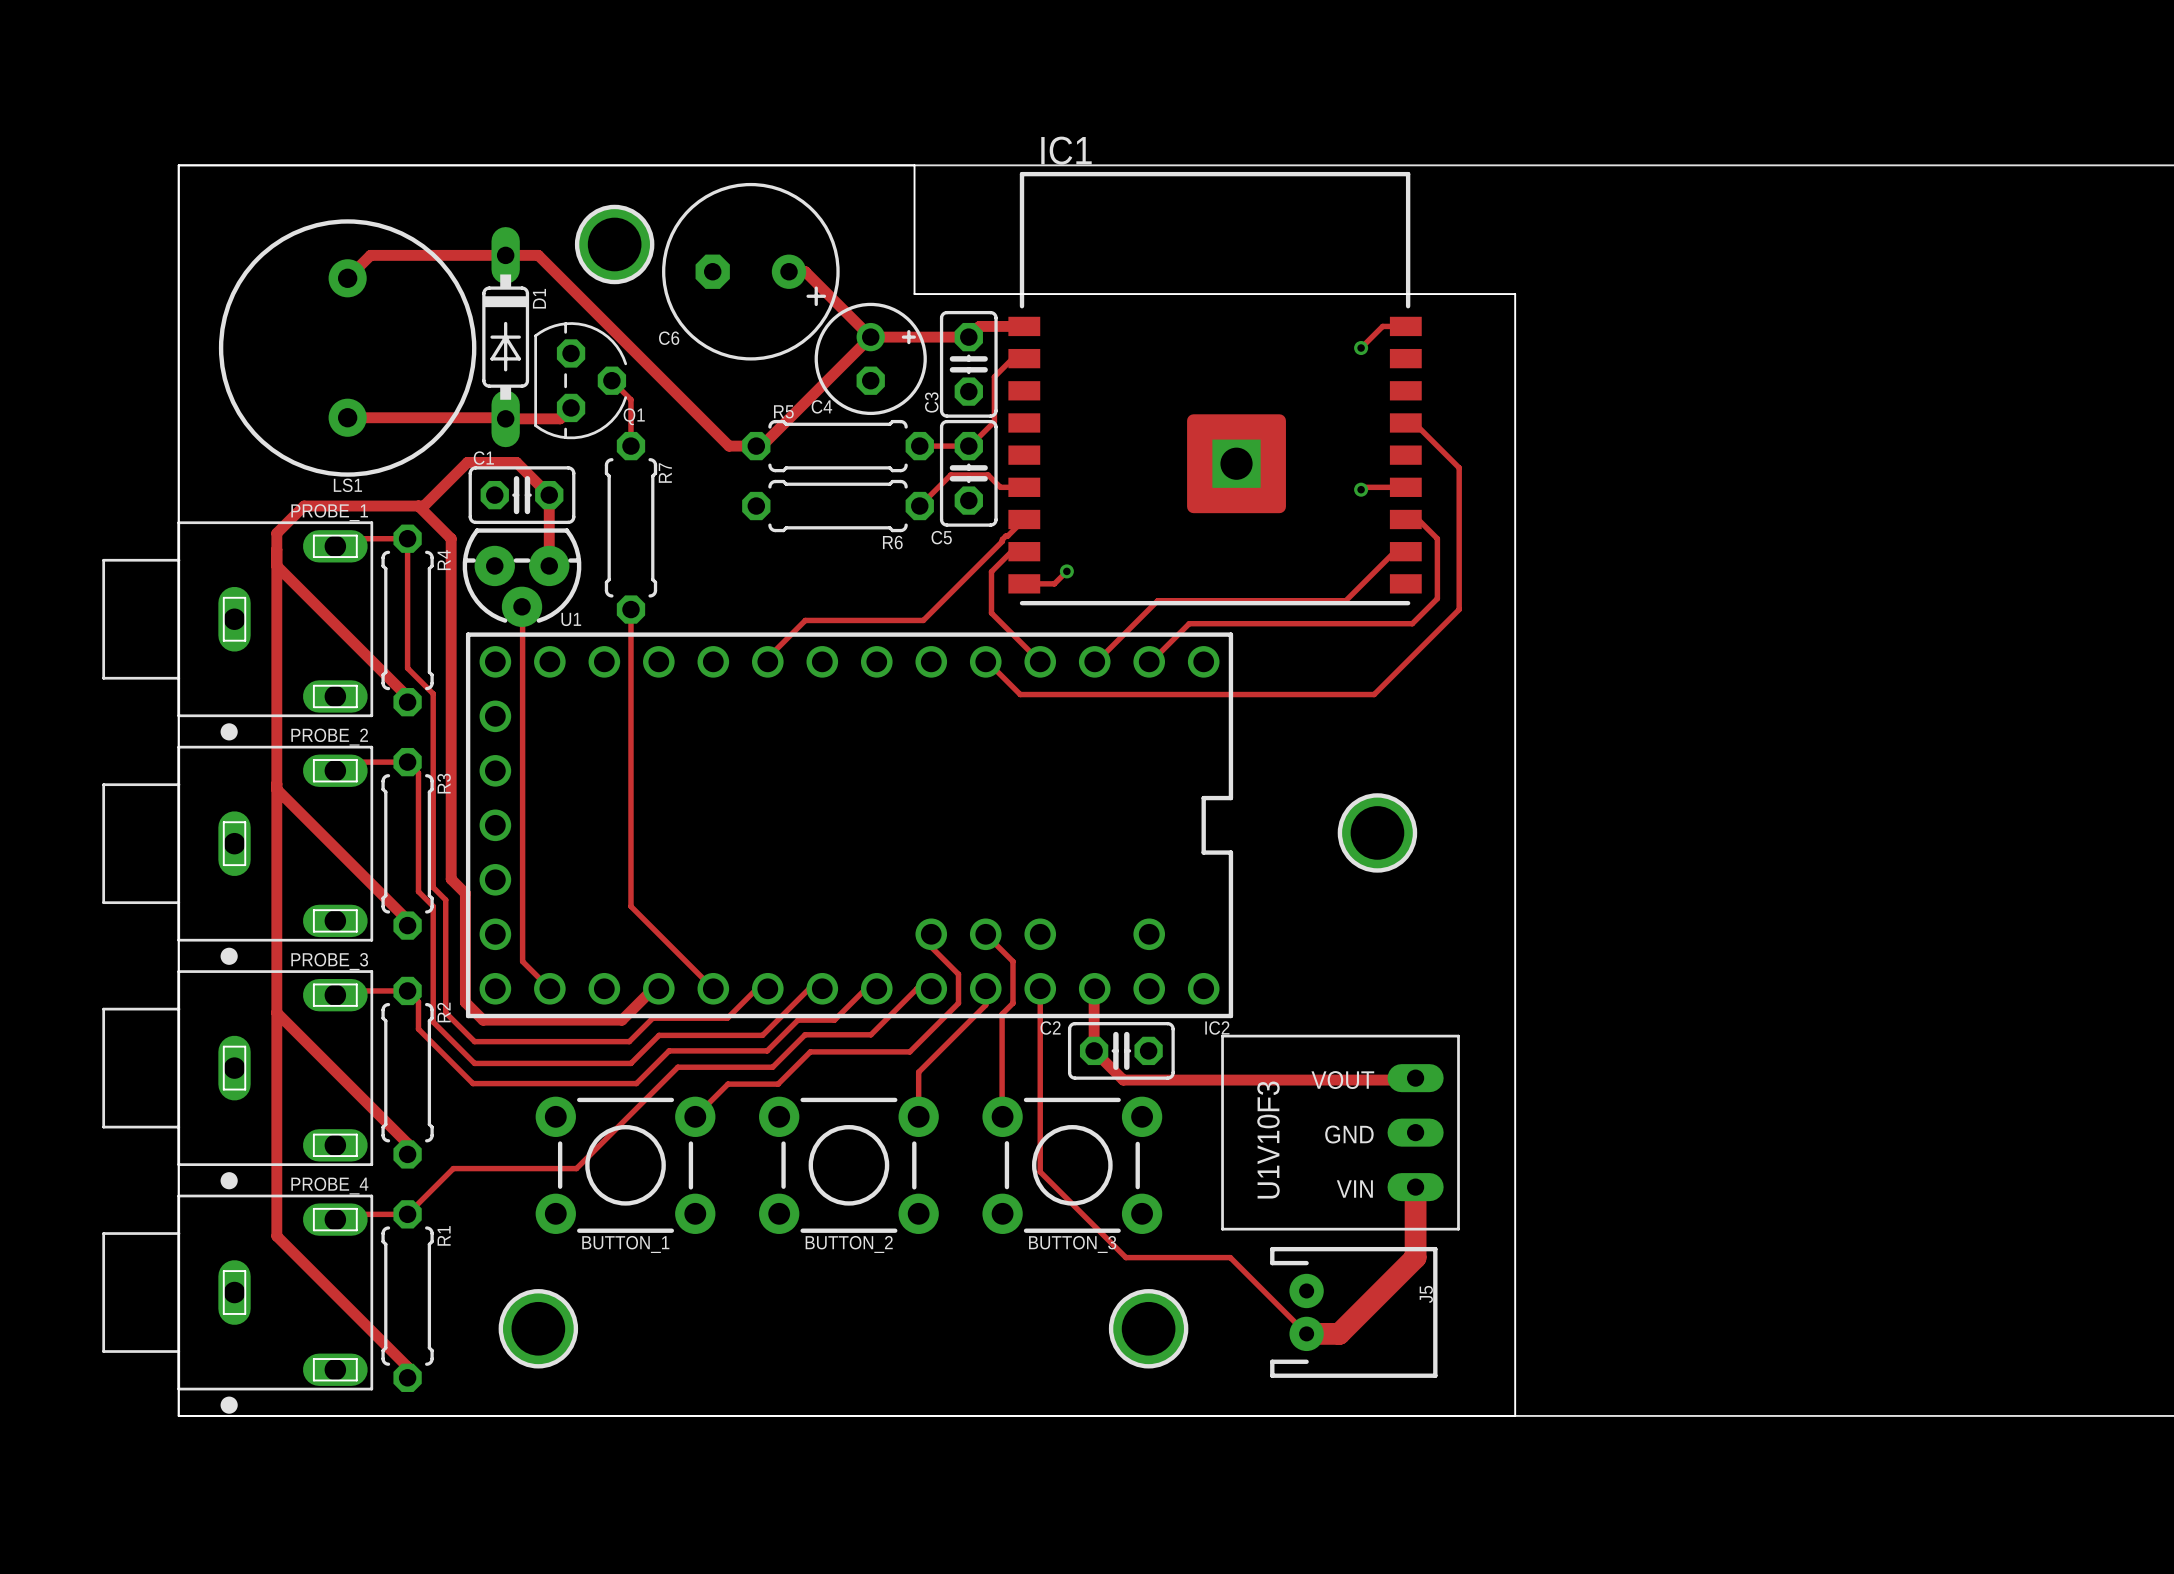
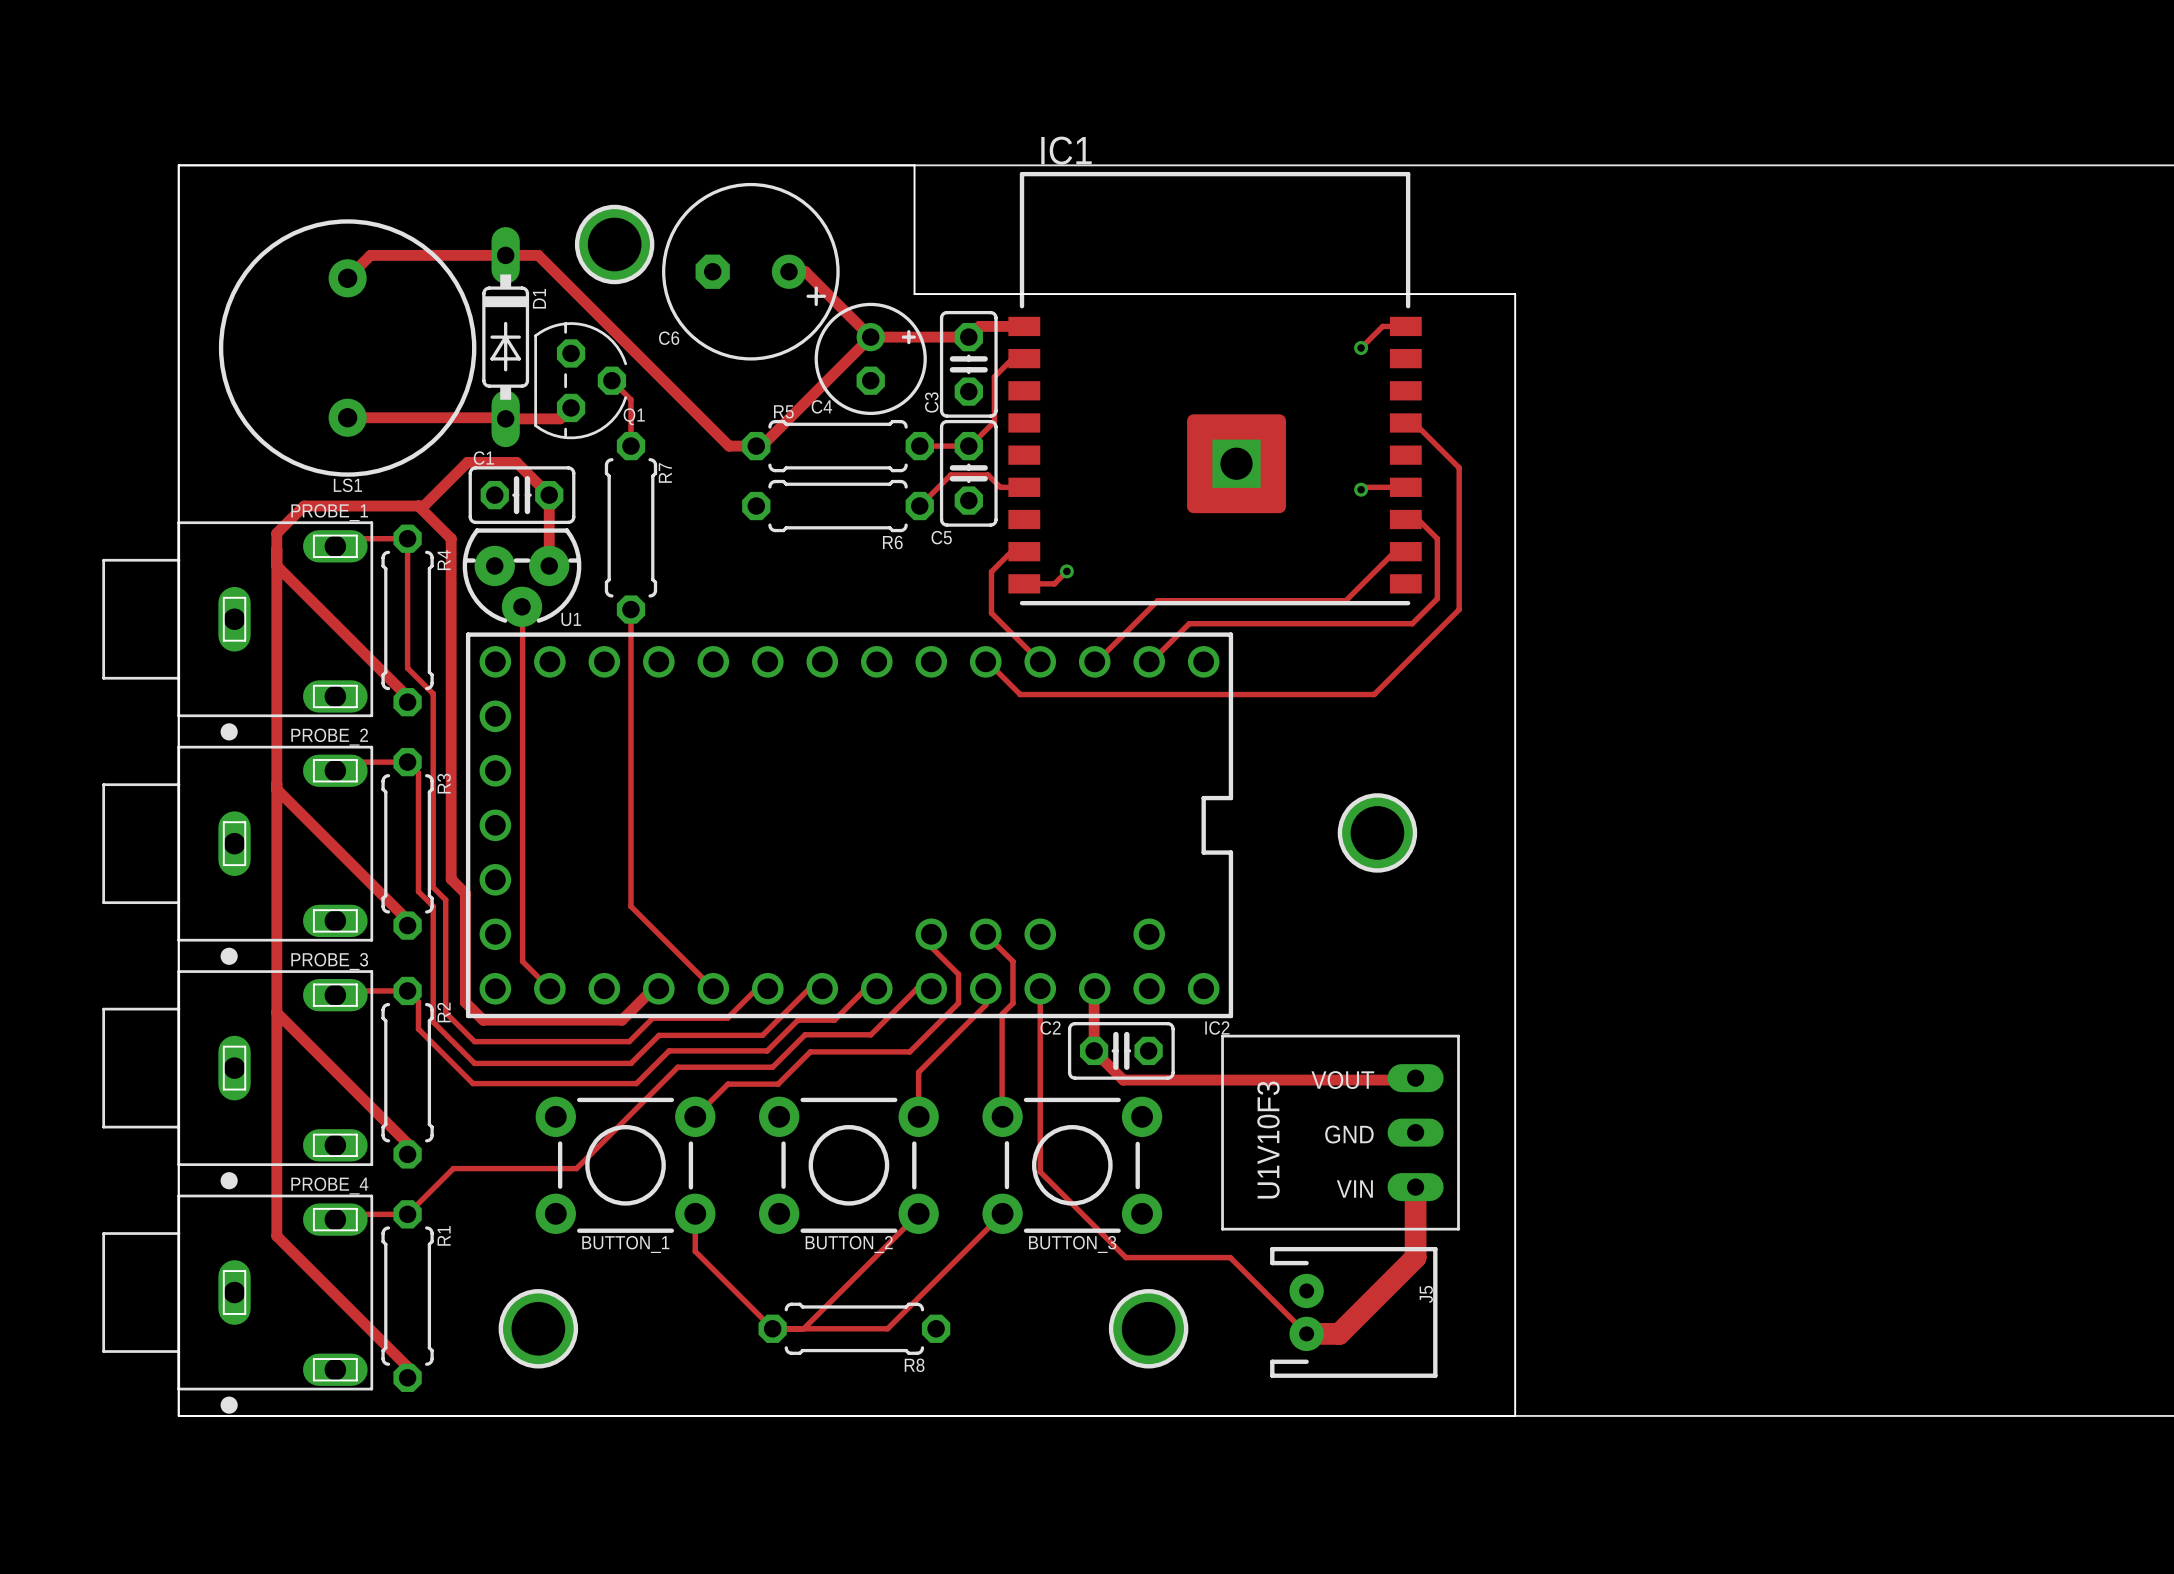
track: (1024, 519) (923, 620) (805, 620) (767, 657) (767, 661) -> none
track: none -> (695, 1213) (695, 1251) (772, 1328) (887, 1328) (1002, 1213)
track: none -> (918, 1213) (803, 1328)
R8: none -> (854, 1328)

